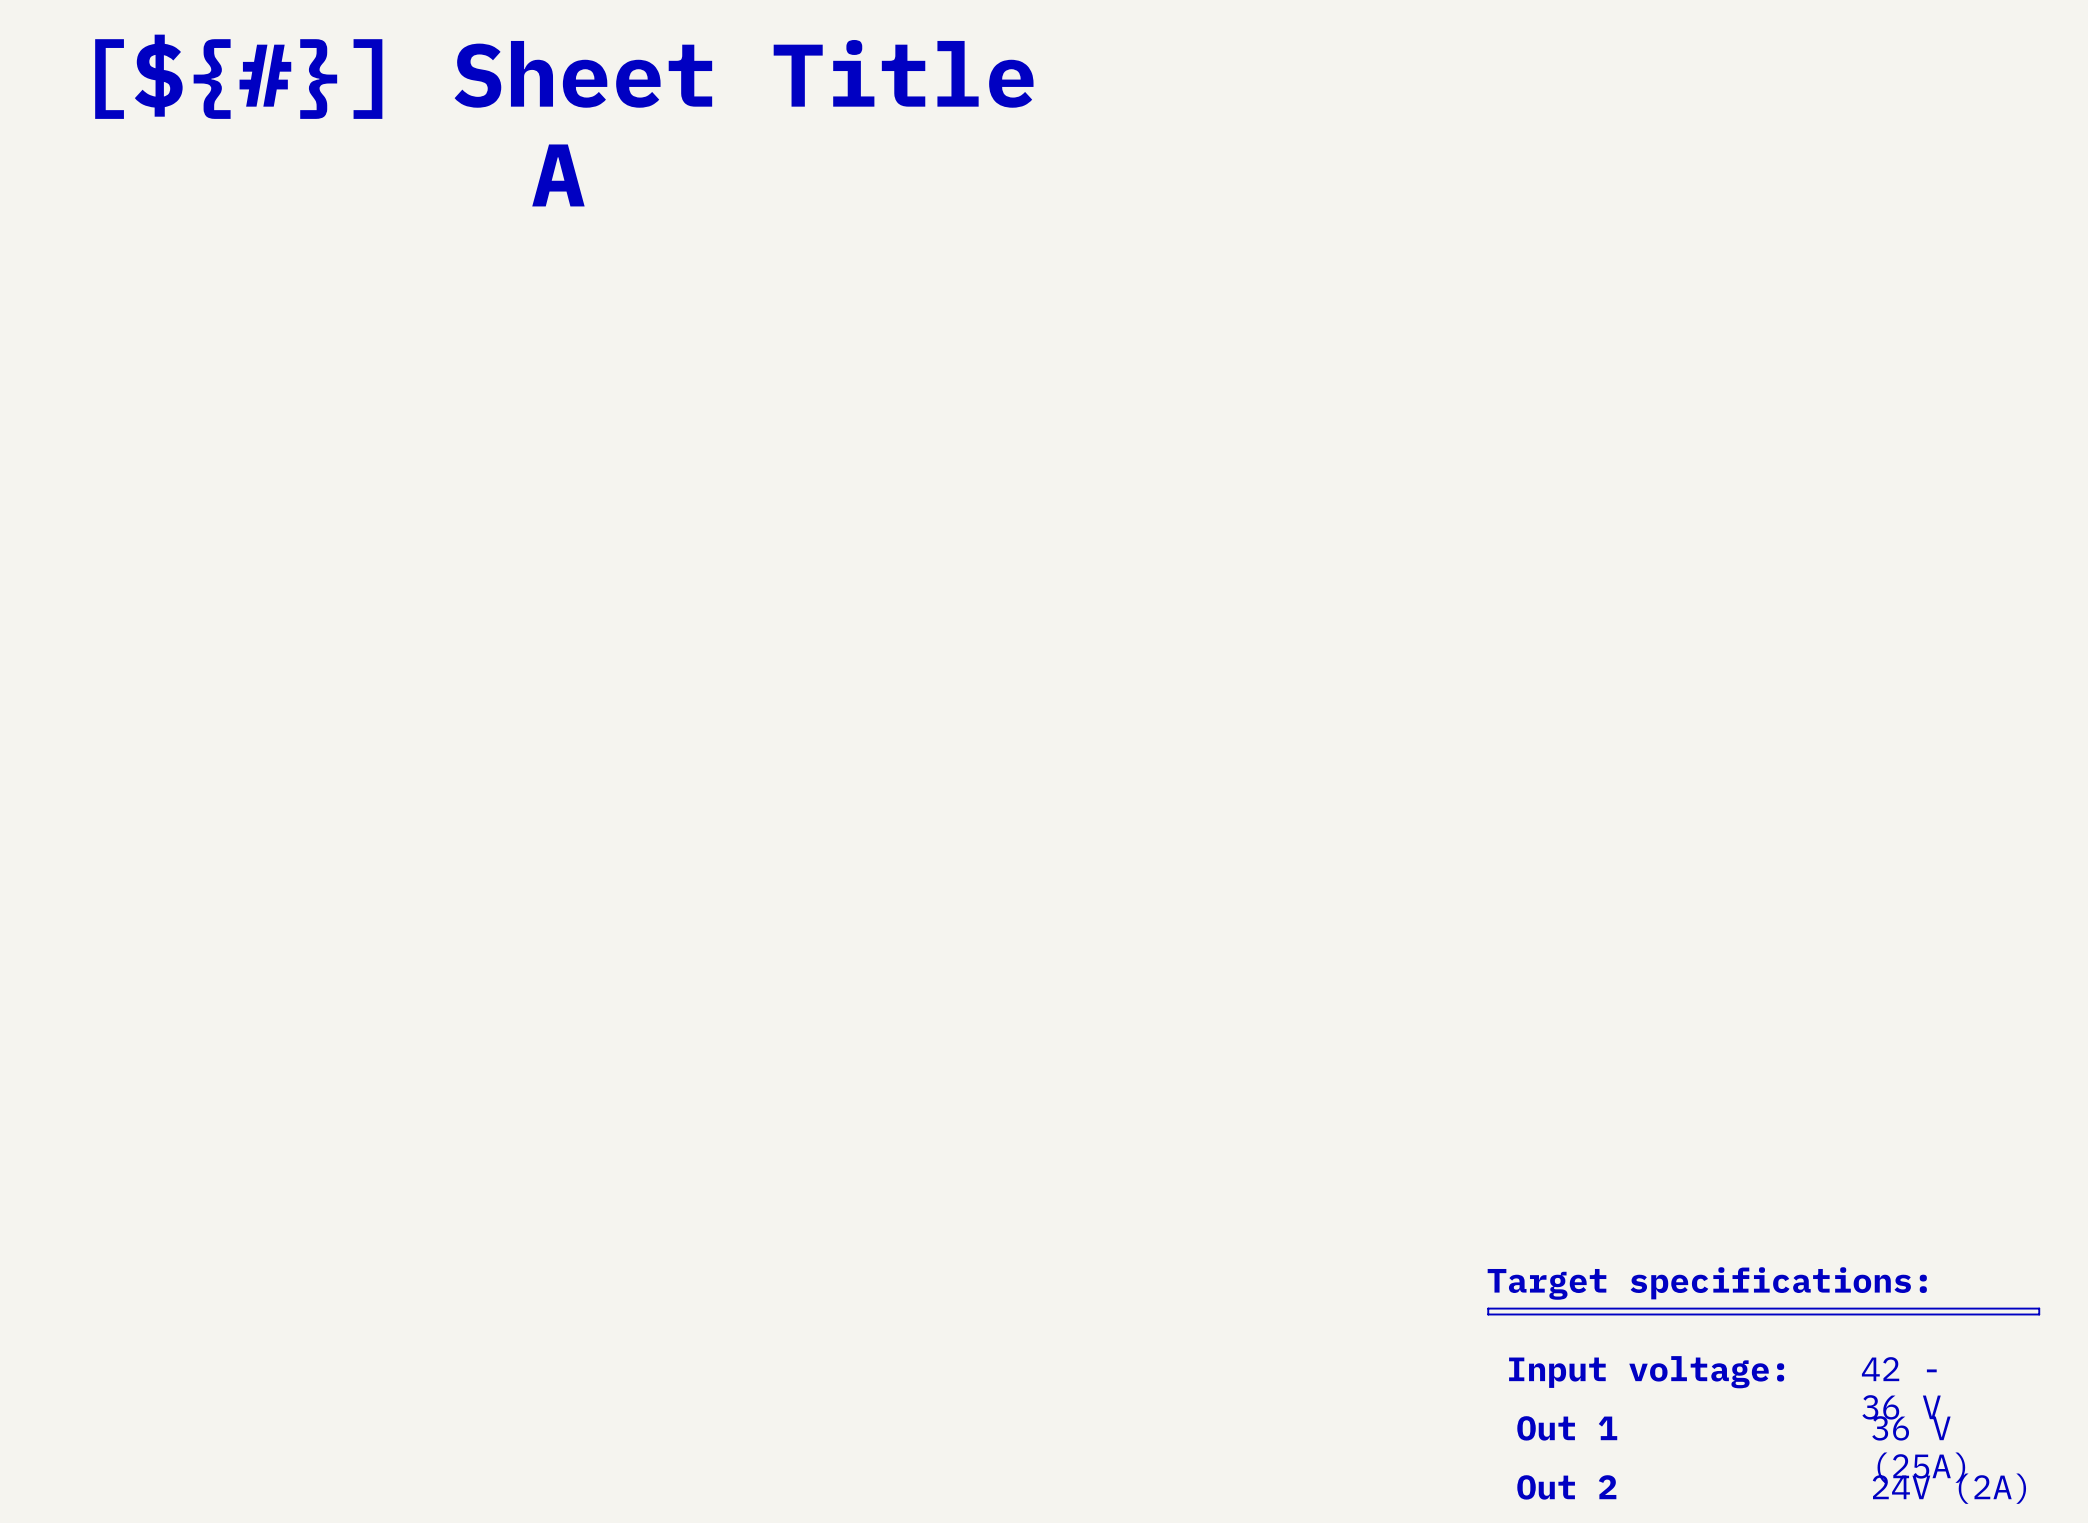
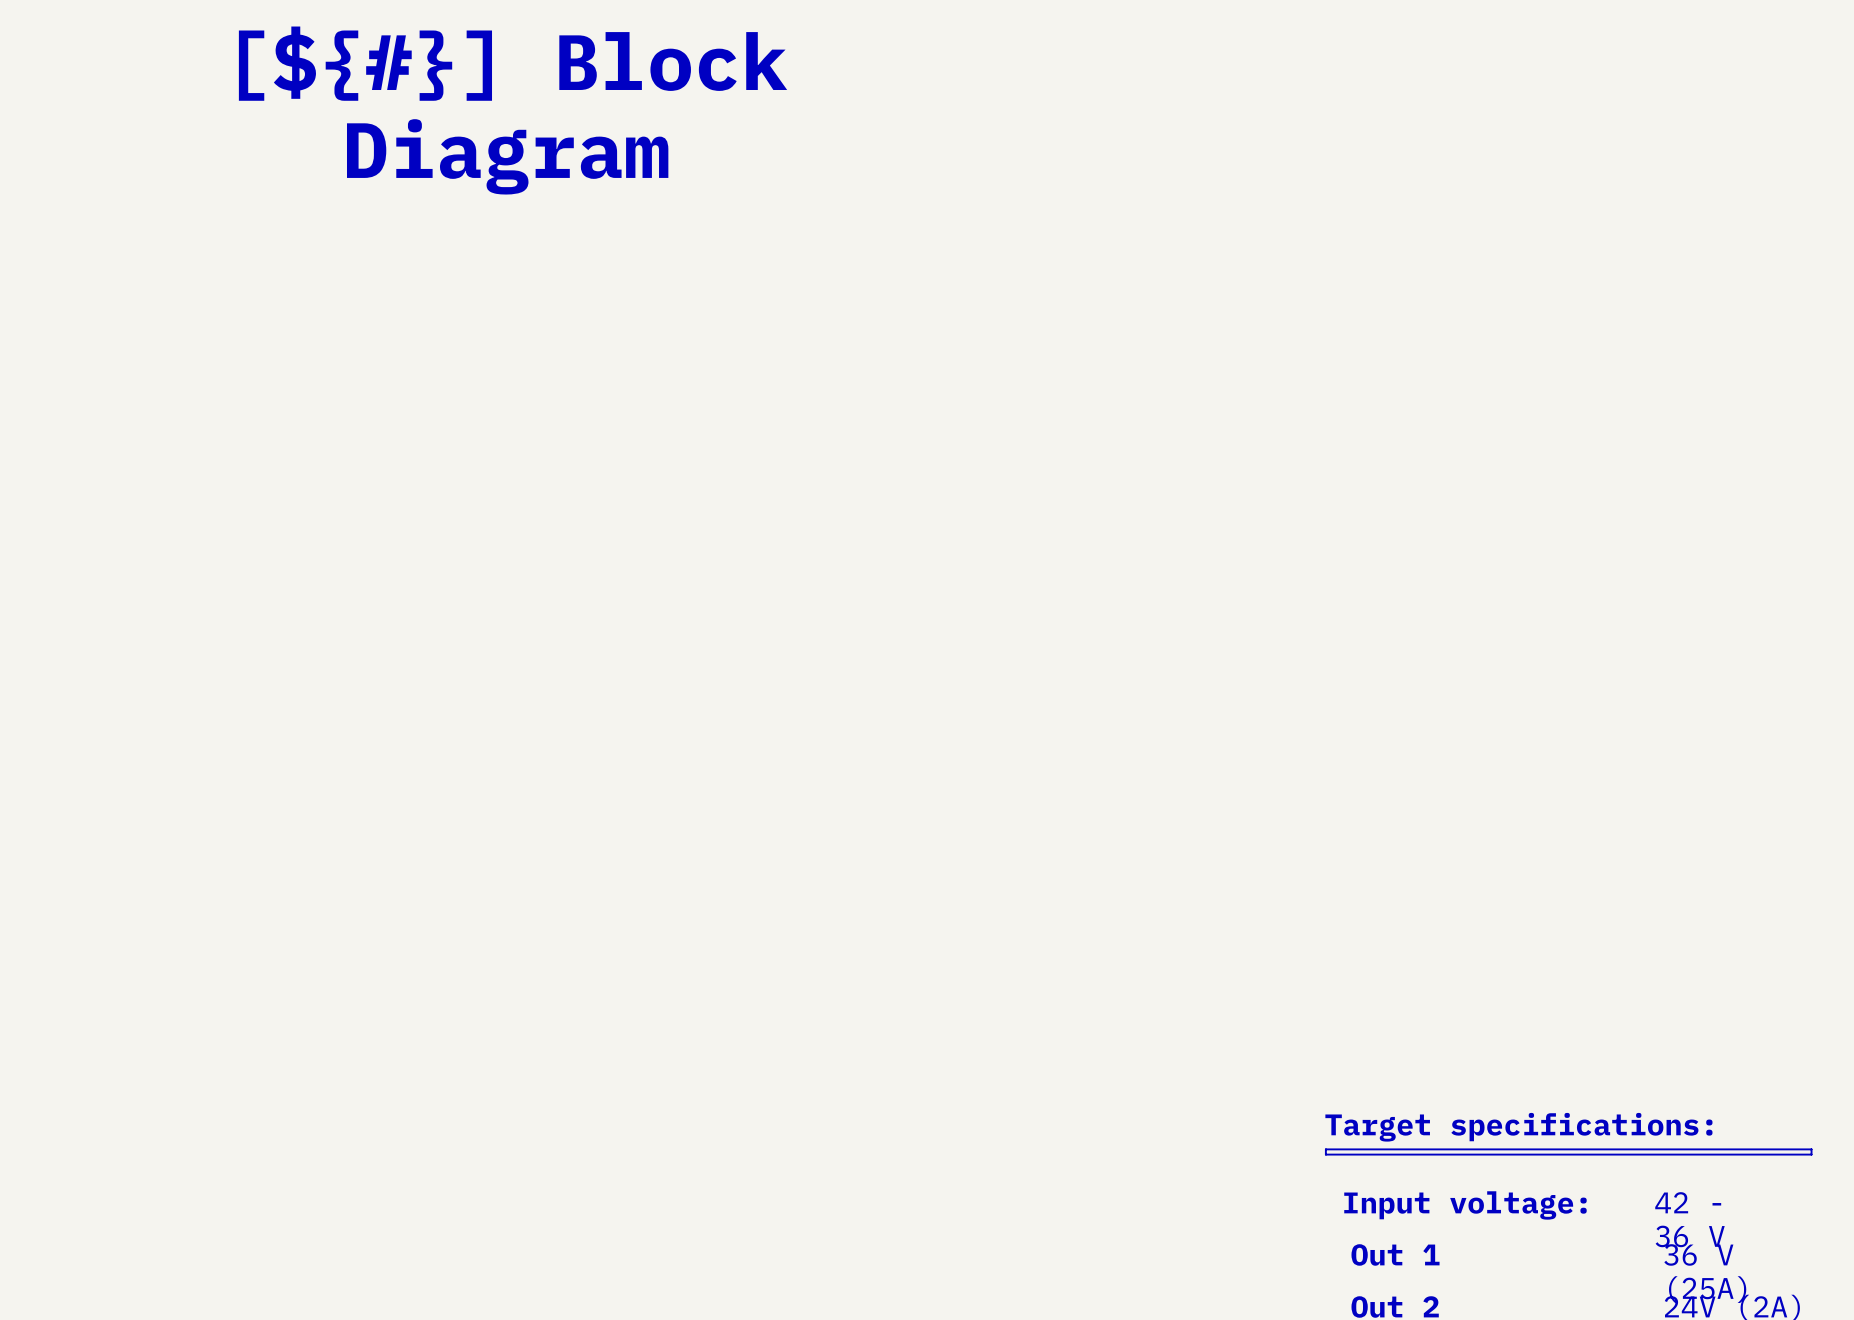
text: [${#}] Sheet Title (564, 76) -> [${#}] Block (513, 63)
text: A (558, 175) -> Diagram (507, 156)

